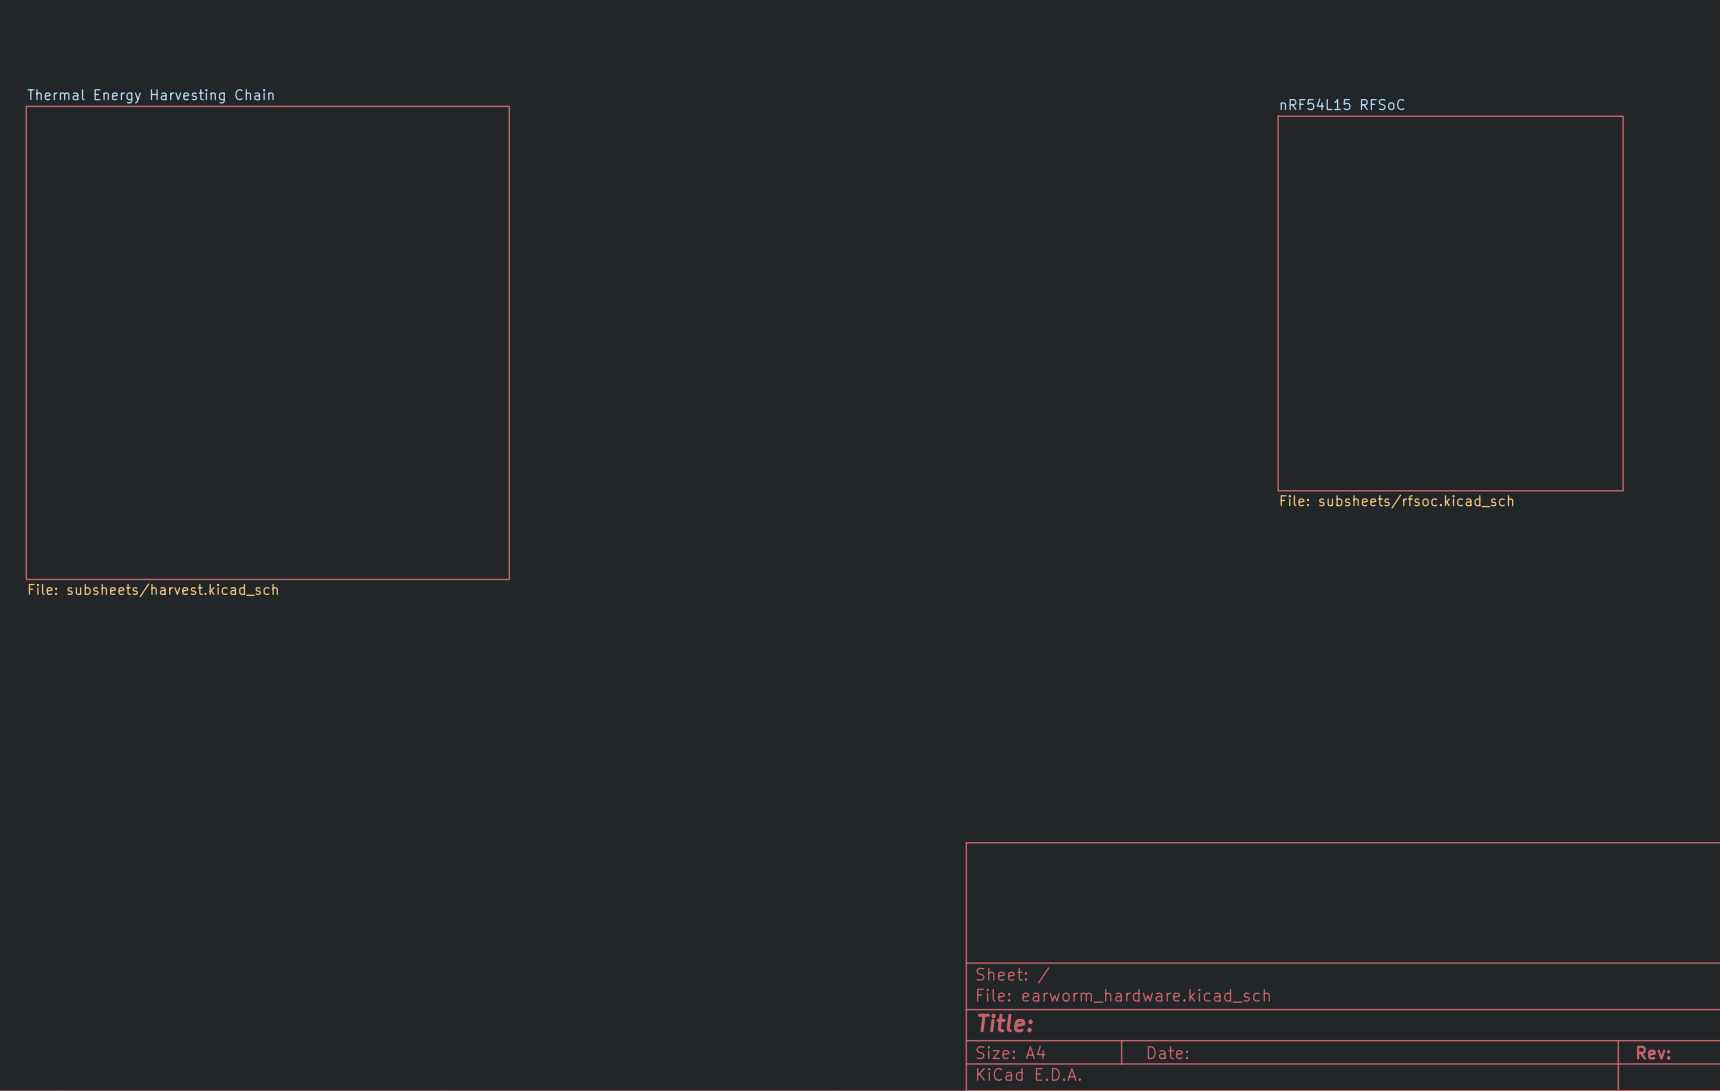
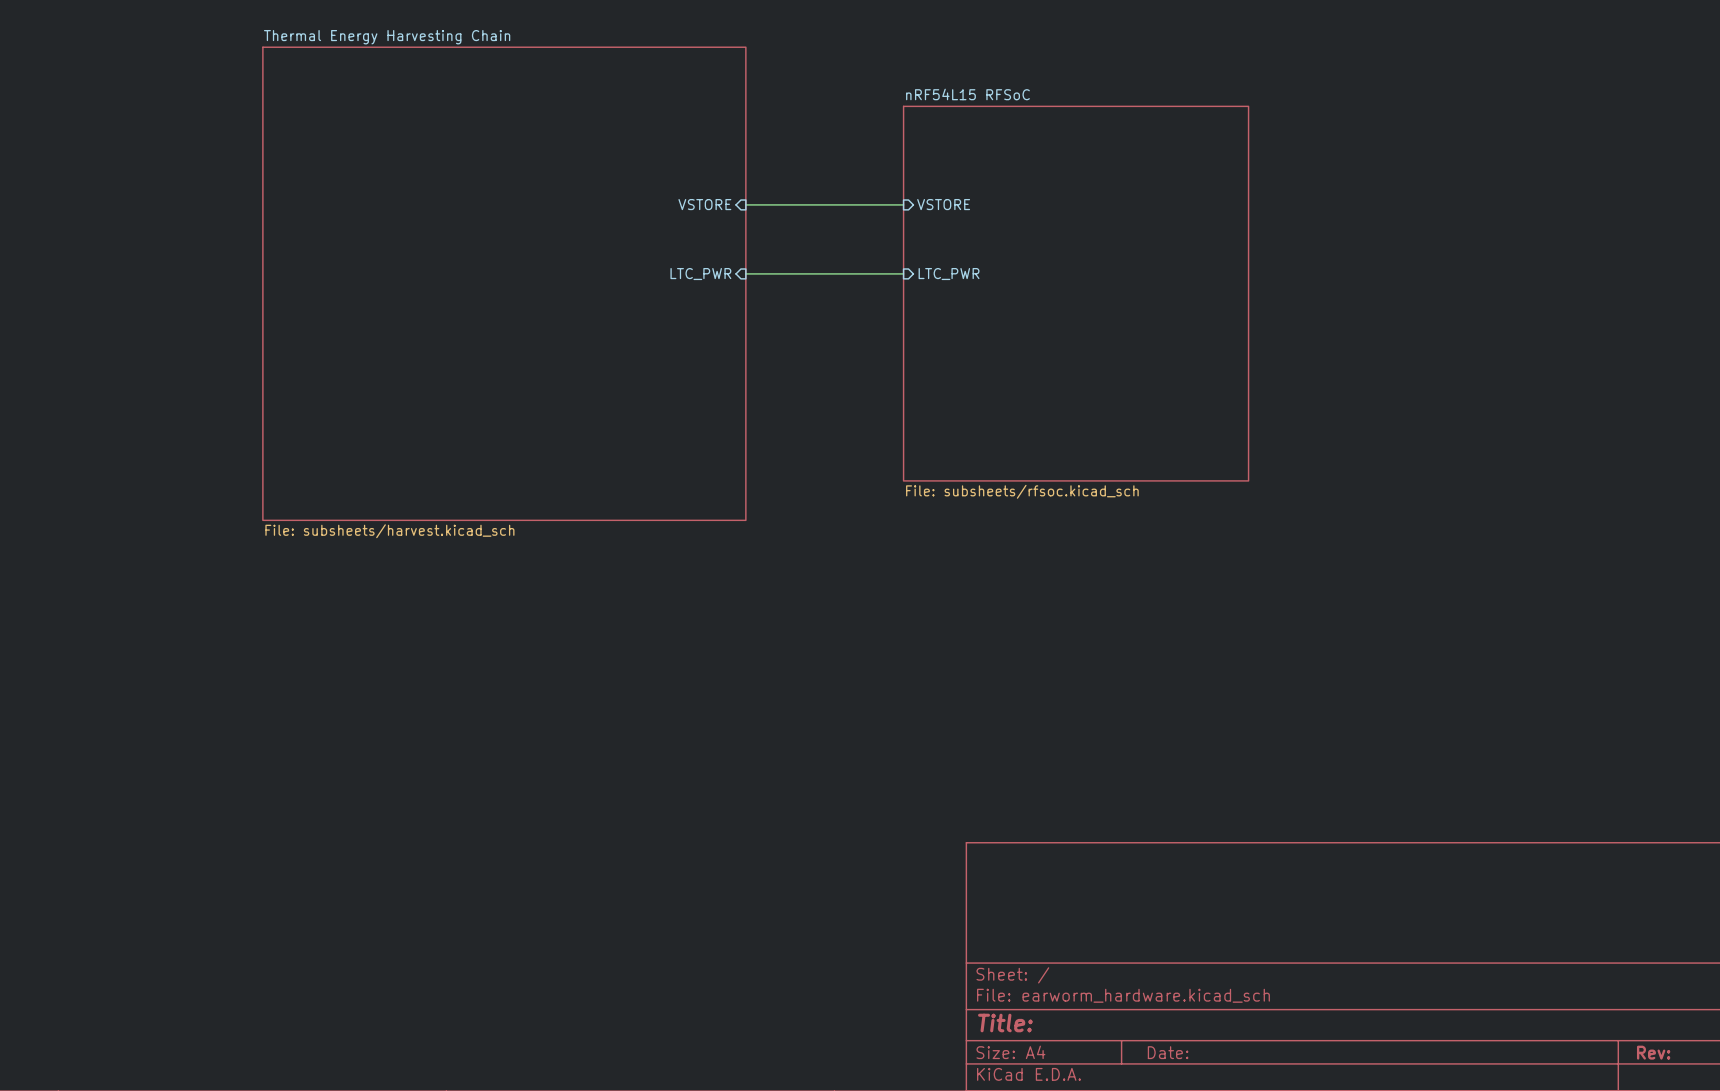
sheet pin: none -> VSTORE (704, 204)
wire: none -> (745, 204) (903, 204)
sheet pin: none -> VSTORE (943, 204)
wire: none -> (745, 273) (903, 273)
sheet pin: none -> LTC_PWR (700, 274)
sheet pin: none -> LTC_PWR (949, 274)
sheet Thermal Energy Harvesting Chain: none -> File: subsheets/harvest.kicad_sch (504, 283)
sheet nRF54L15 RFSoC position: (1450, 303) -> (1076, 293)
sheet Thermal Energy Harvesting Chain: File: subsheets/harvest.kicad_sch (267, 342) -> none

